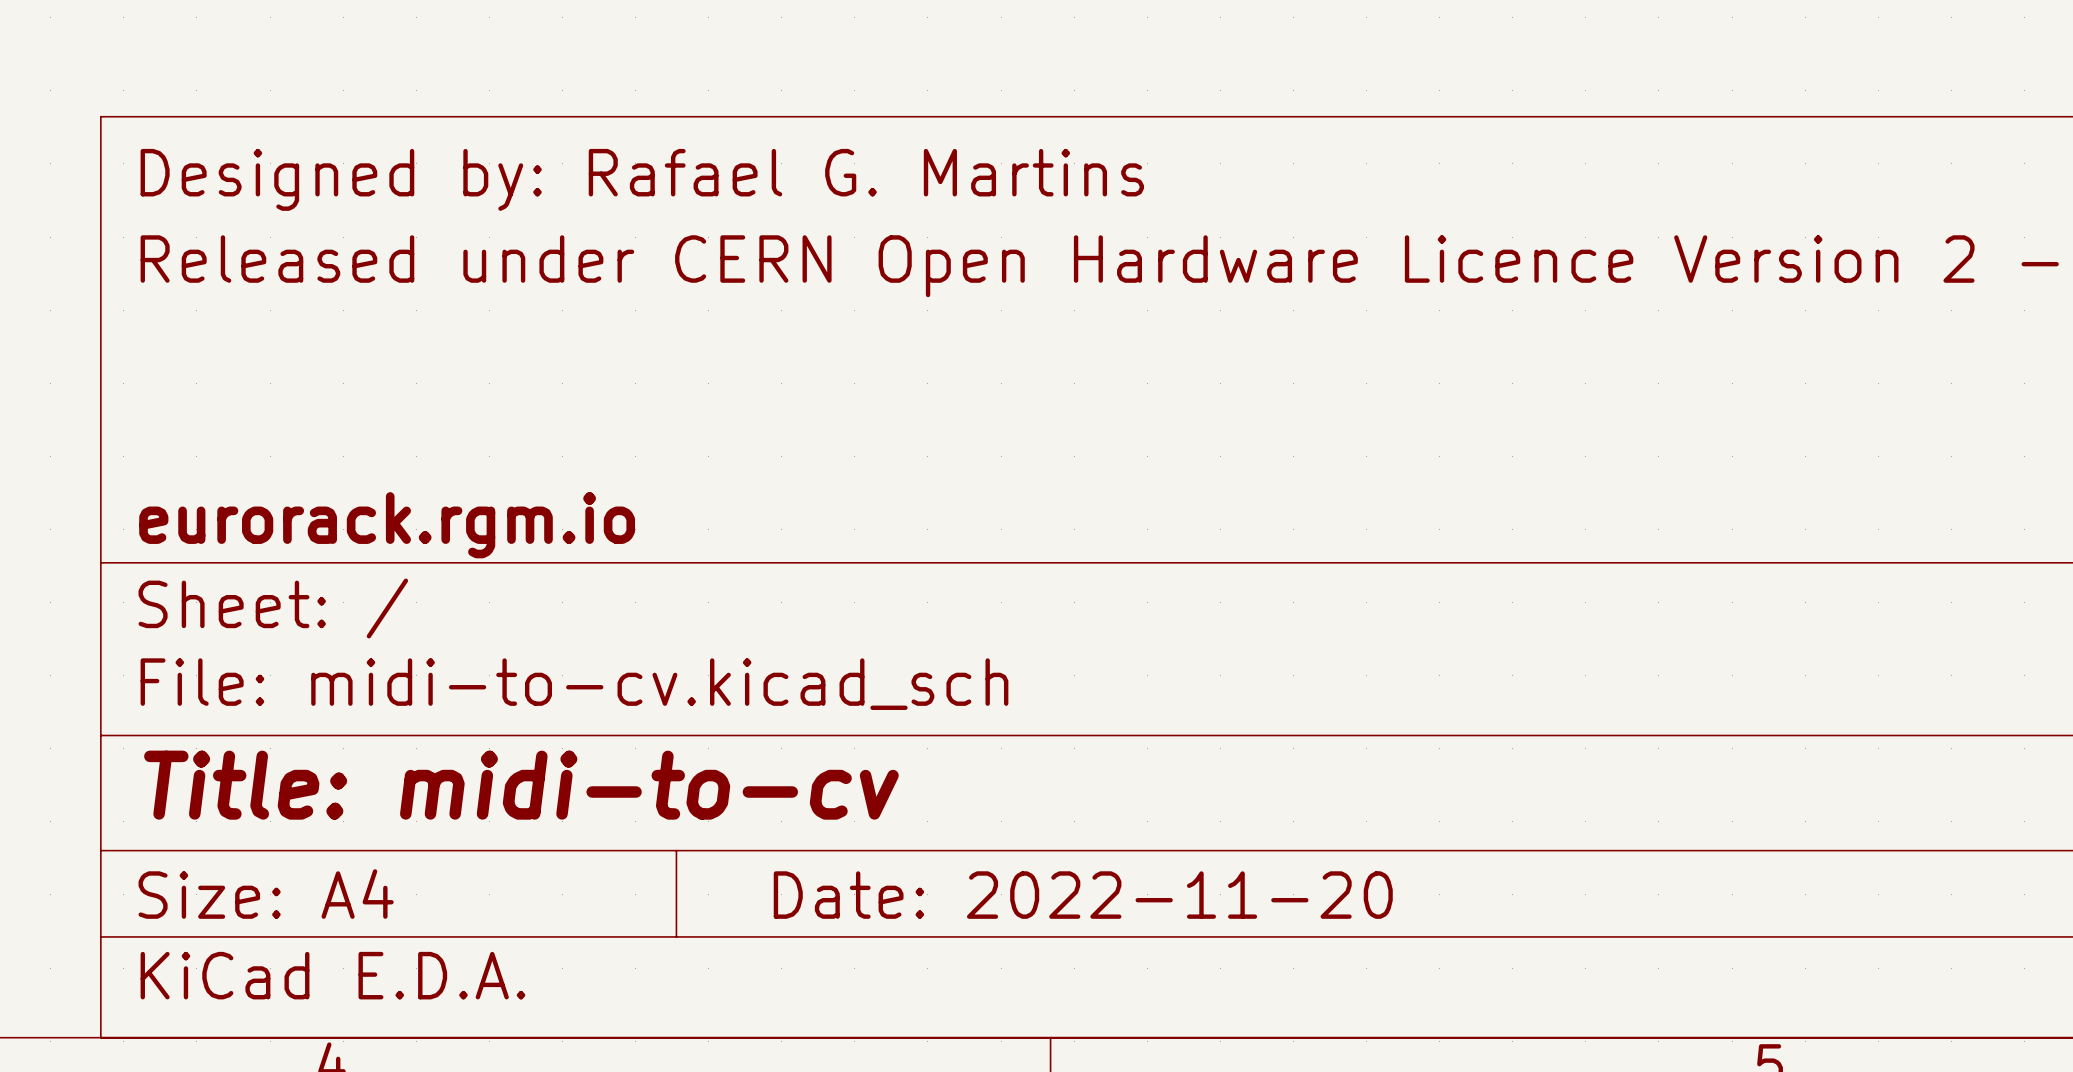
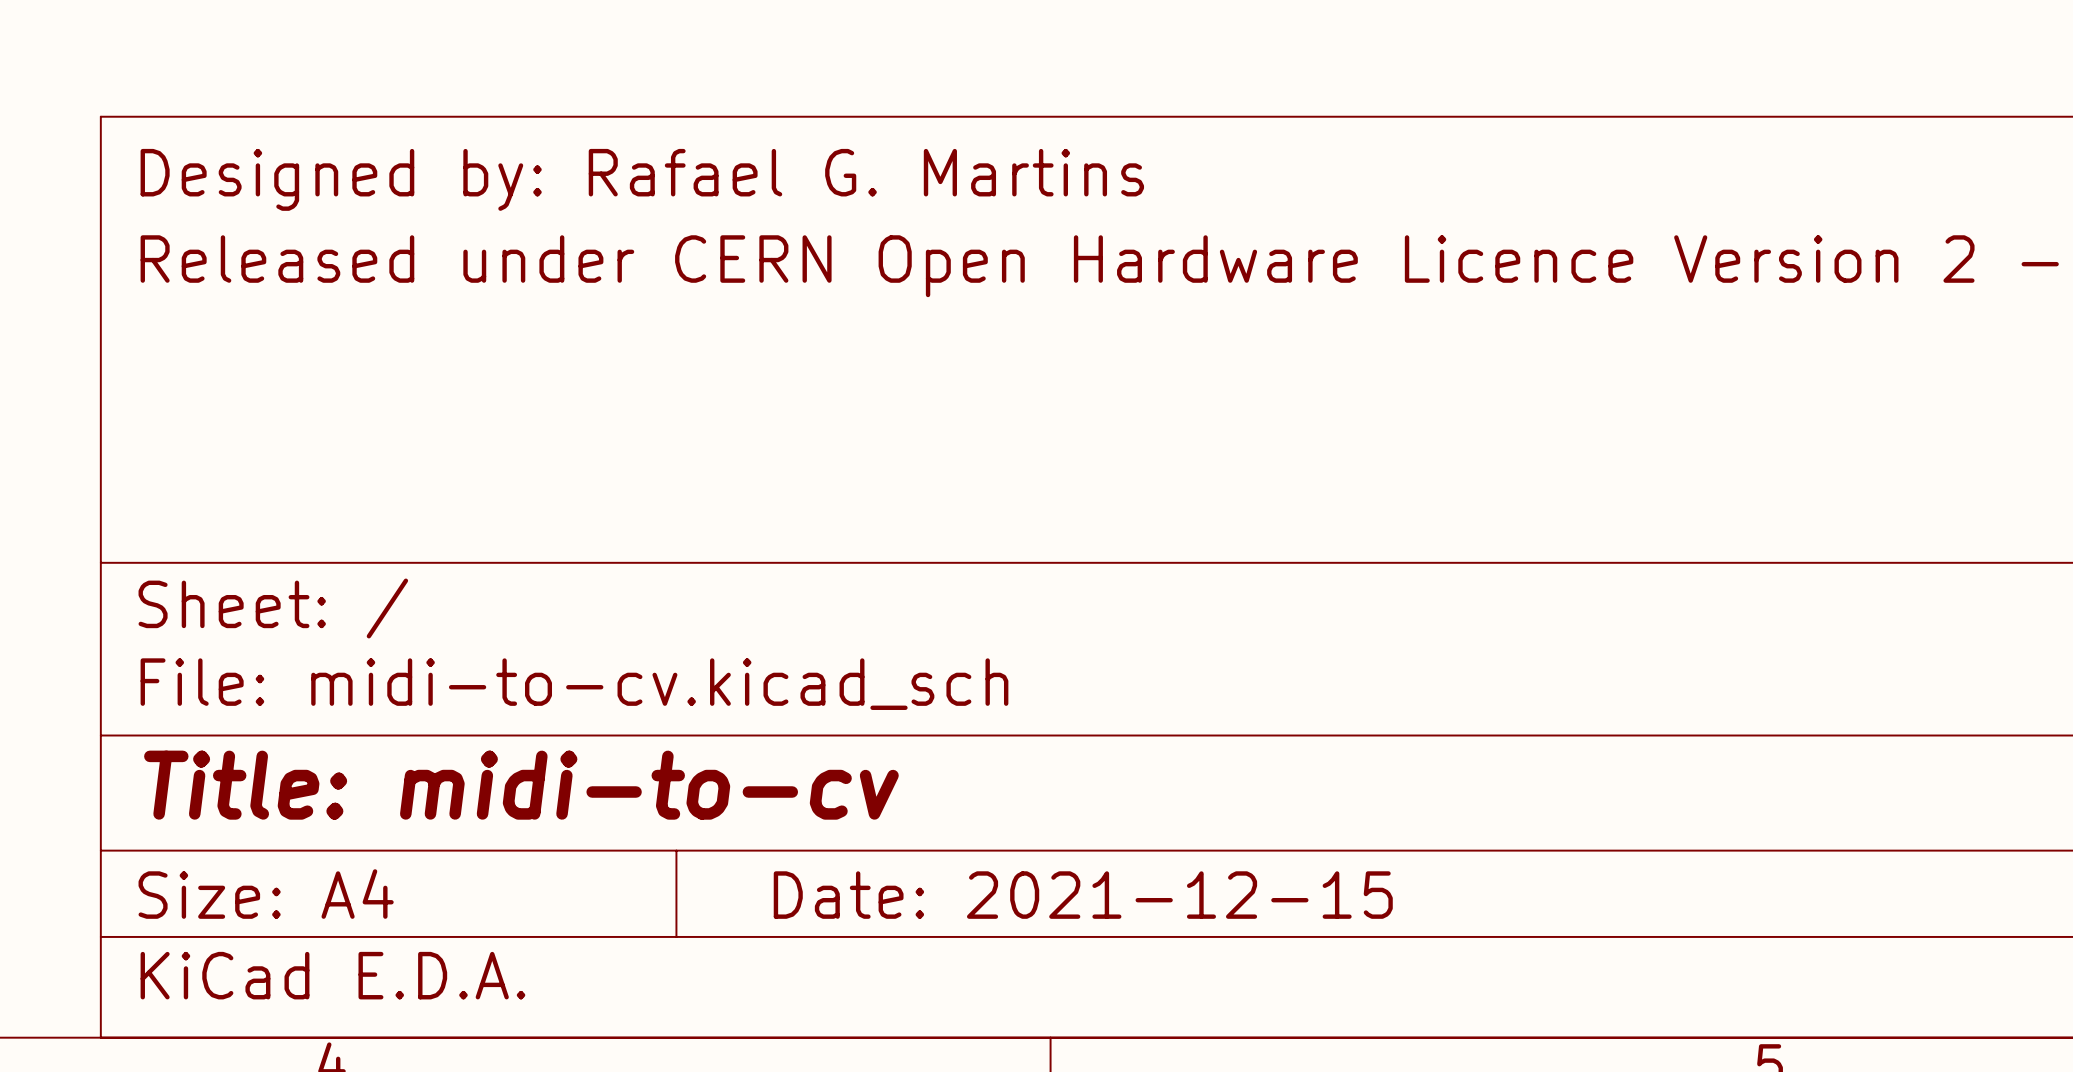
title block: eurorack.rgm.io (387, 525) -> none
title block: Date: 2022-11-20 (1083, 895) -> Date: 2021-12-15 (1083, 895)

